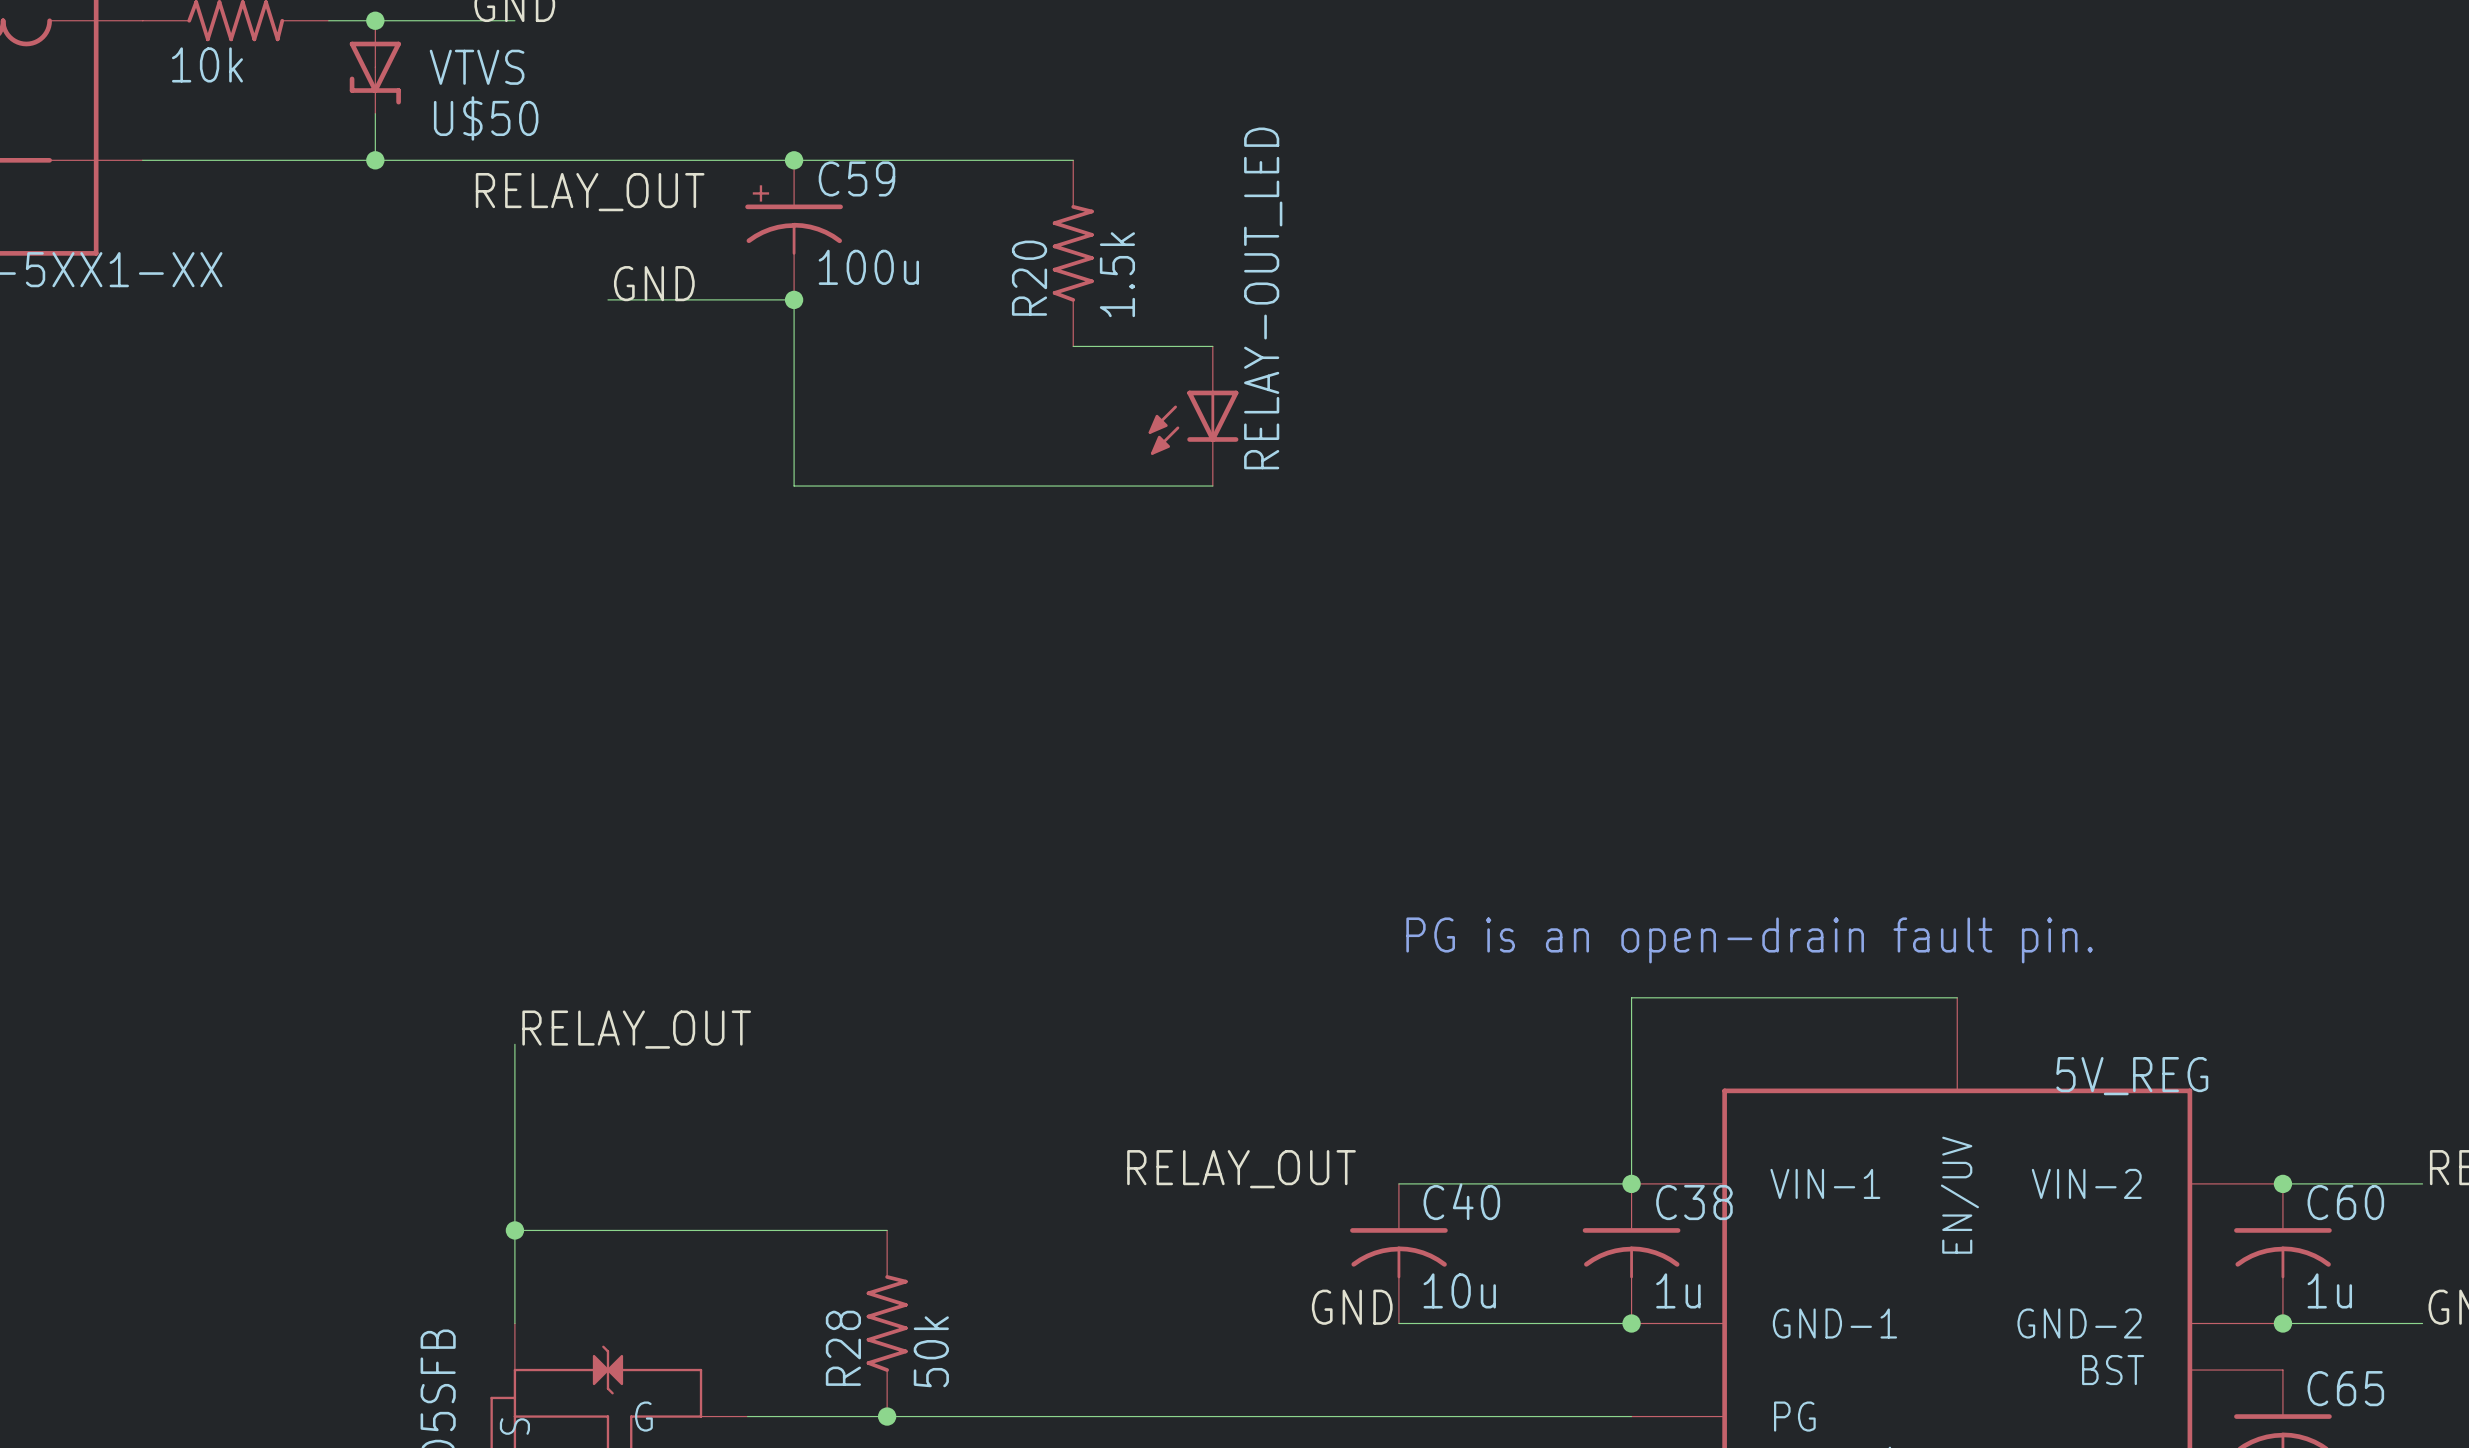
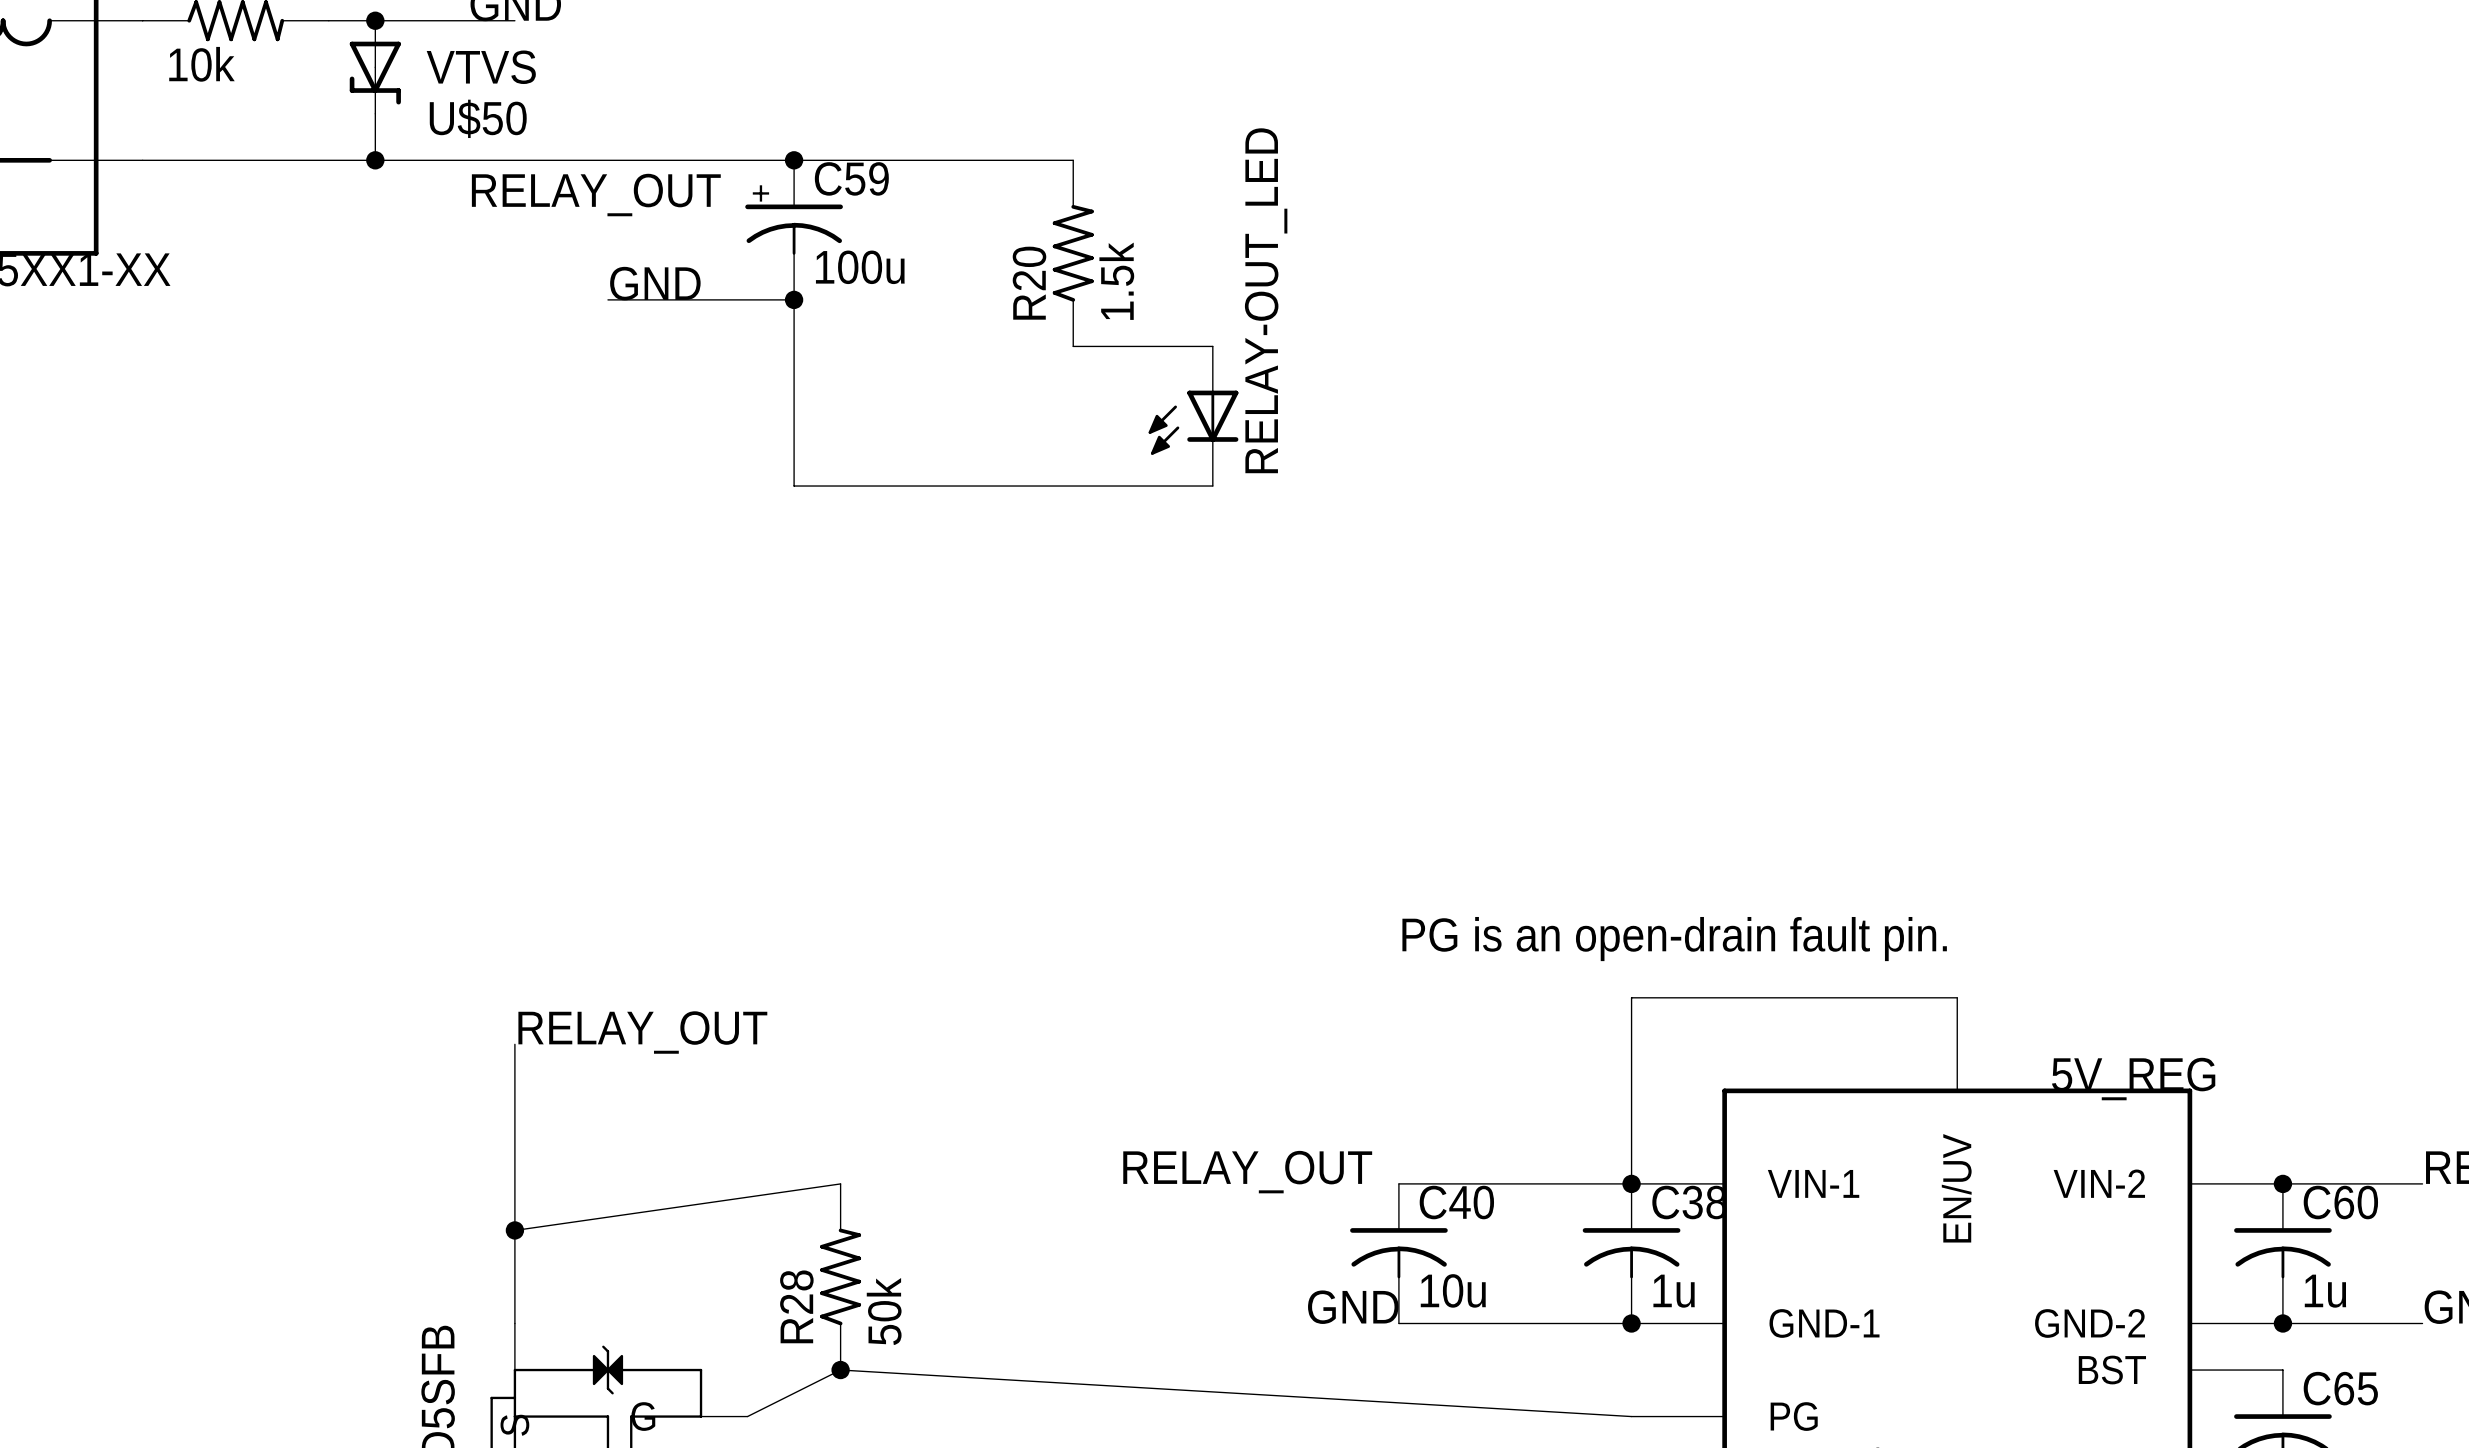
wire: (514, 1230) (887, 1230) -> (514, 1230) (840, 1183)
R28 position: (887, 1323) -> (840, 1276)
wire: (747, 1416) (1631, 1416) -> (747, 1416) (840, 1370) (1631, 1416)
junction position: (887, 1416) -> (840, 1370)

